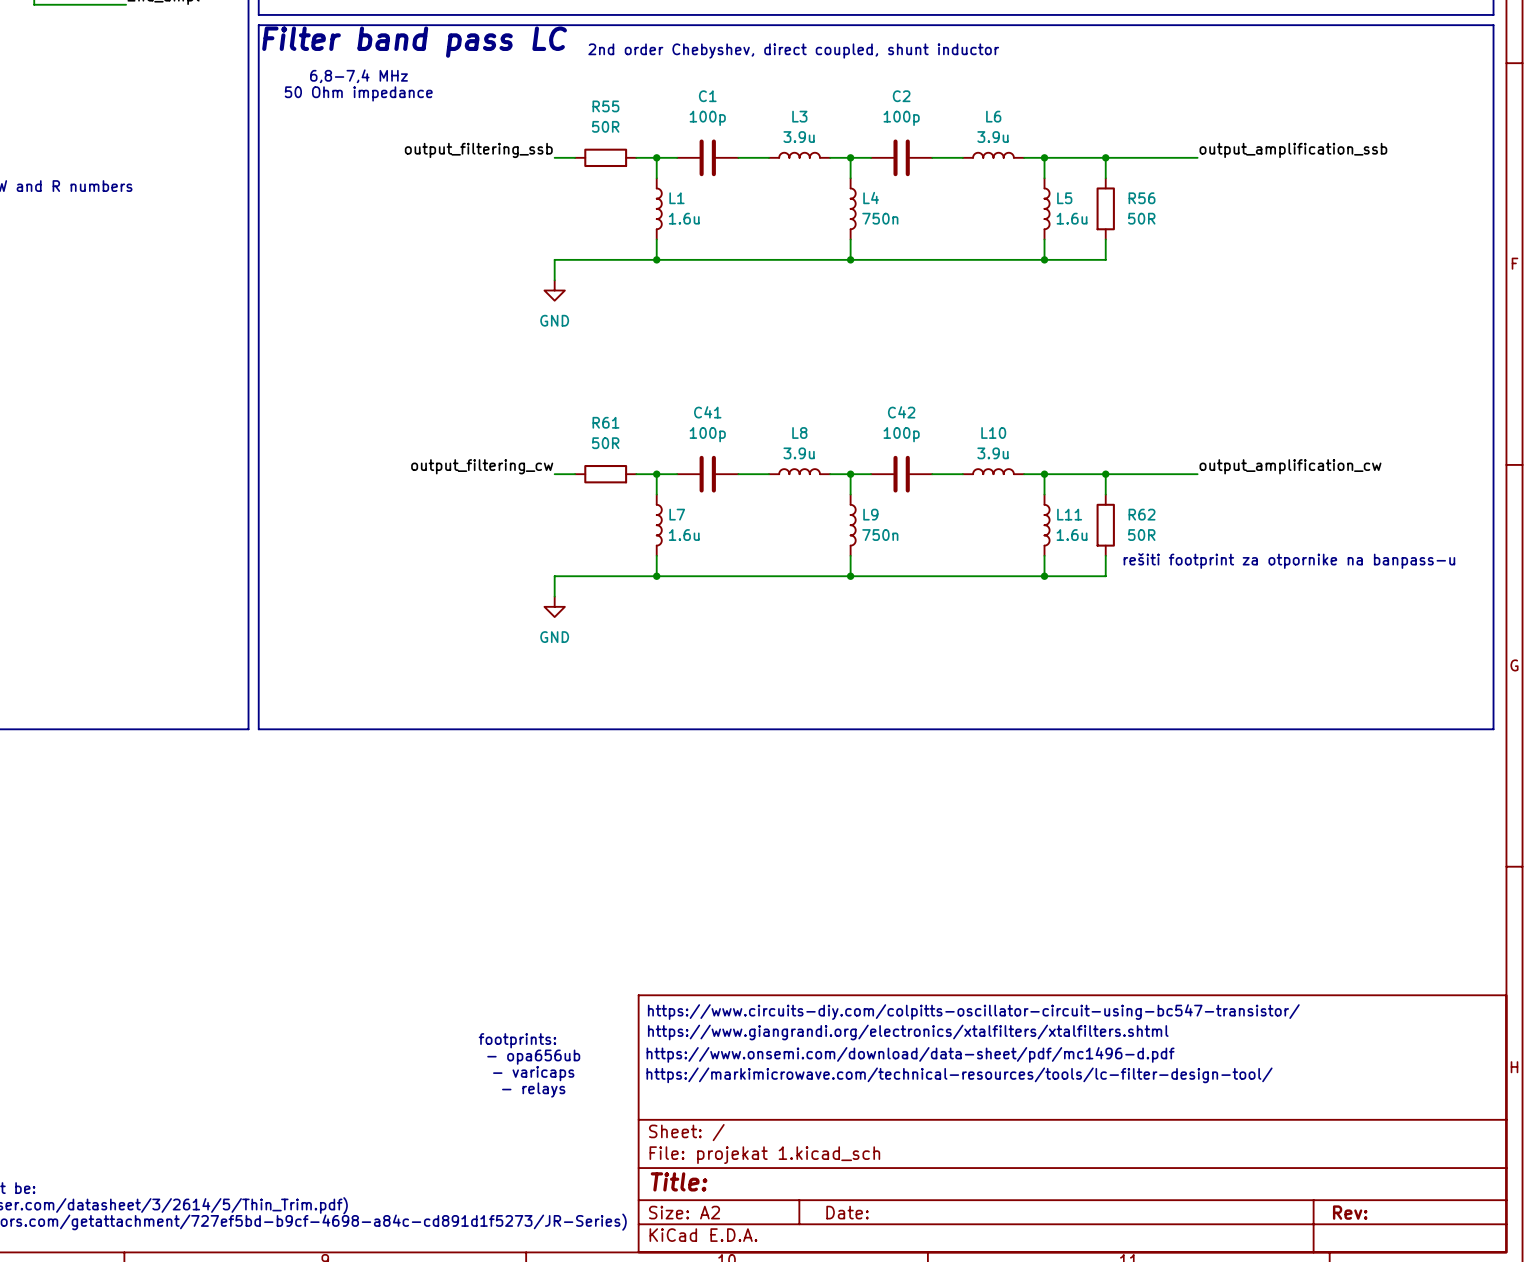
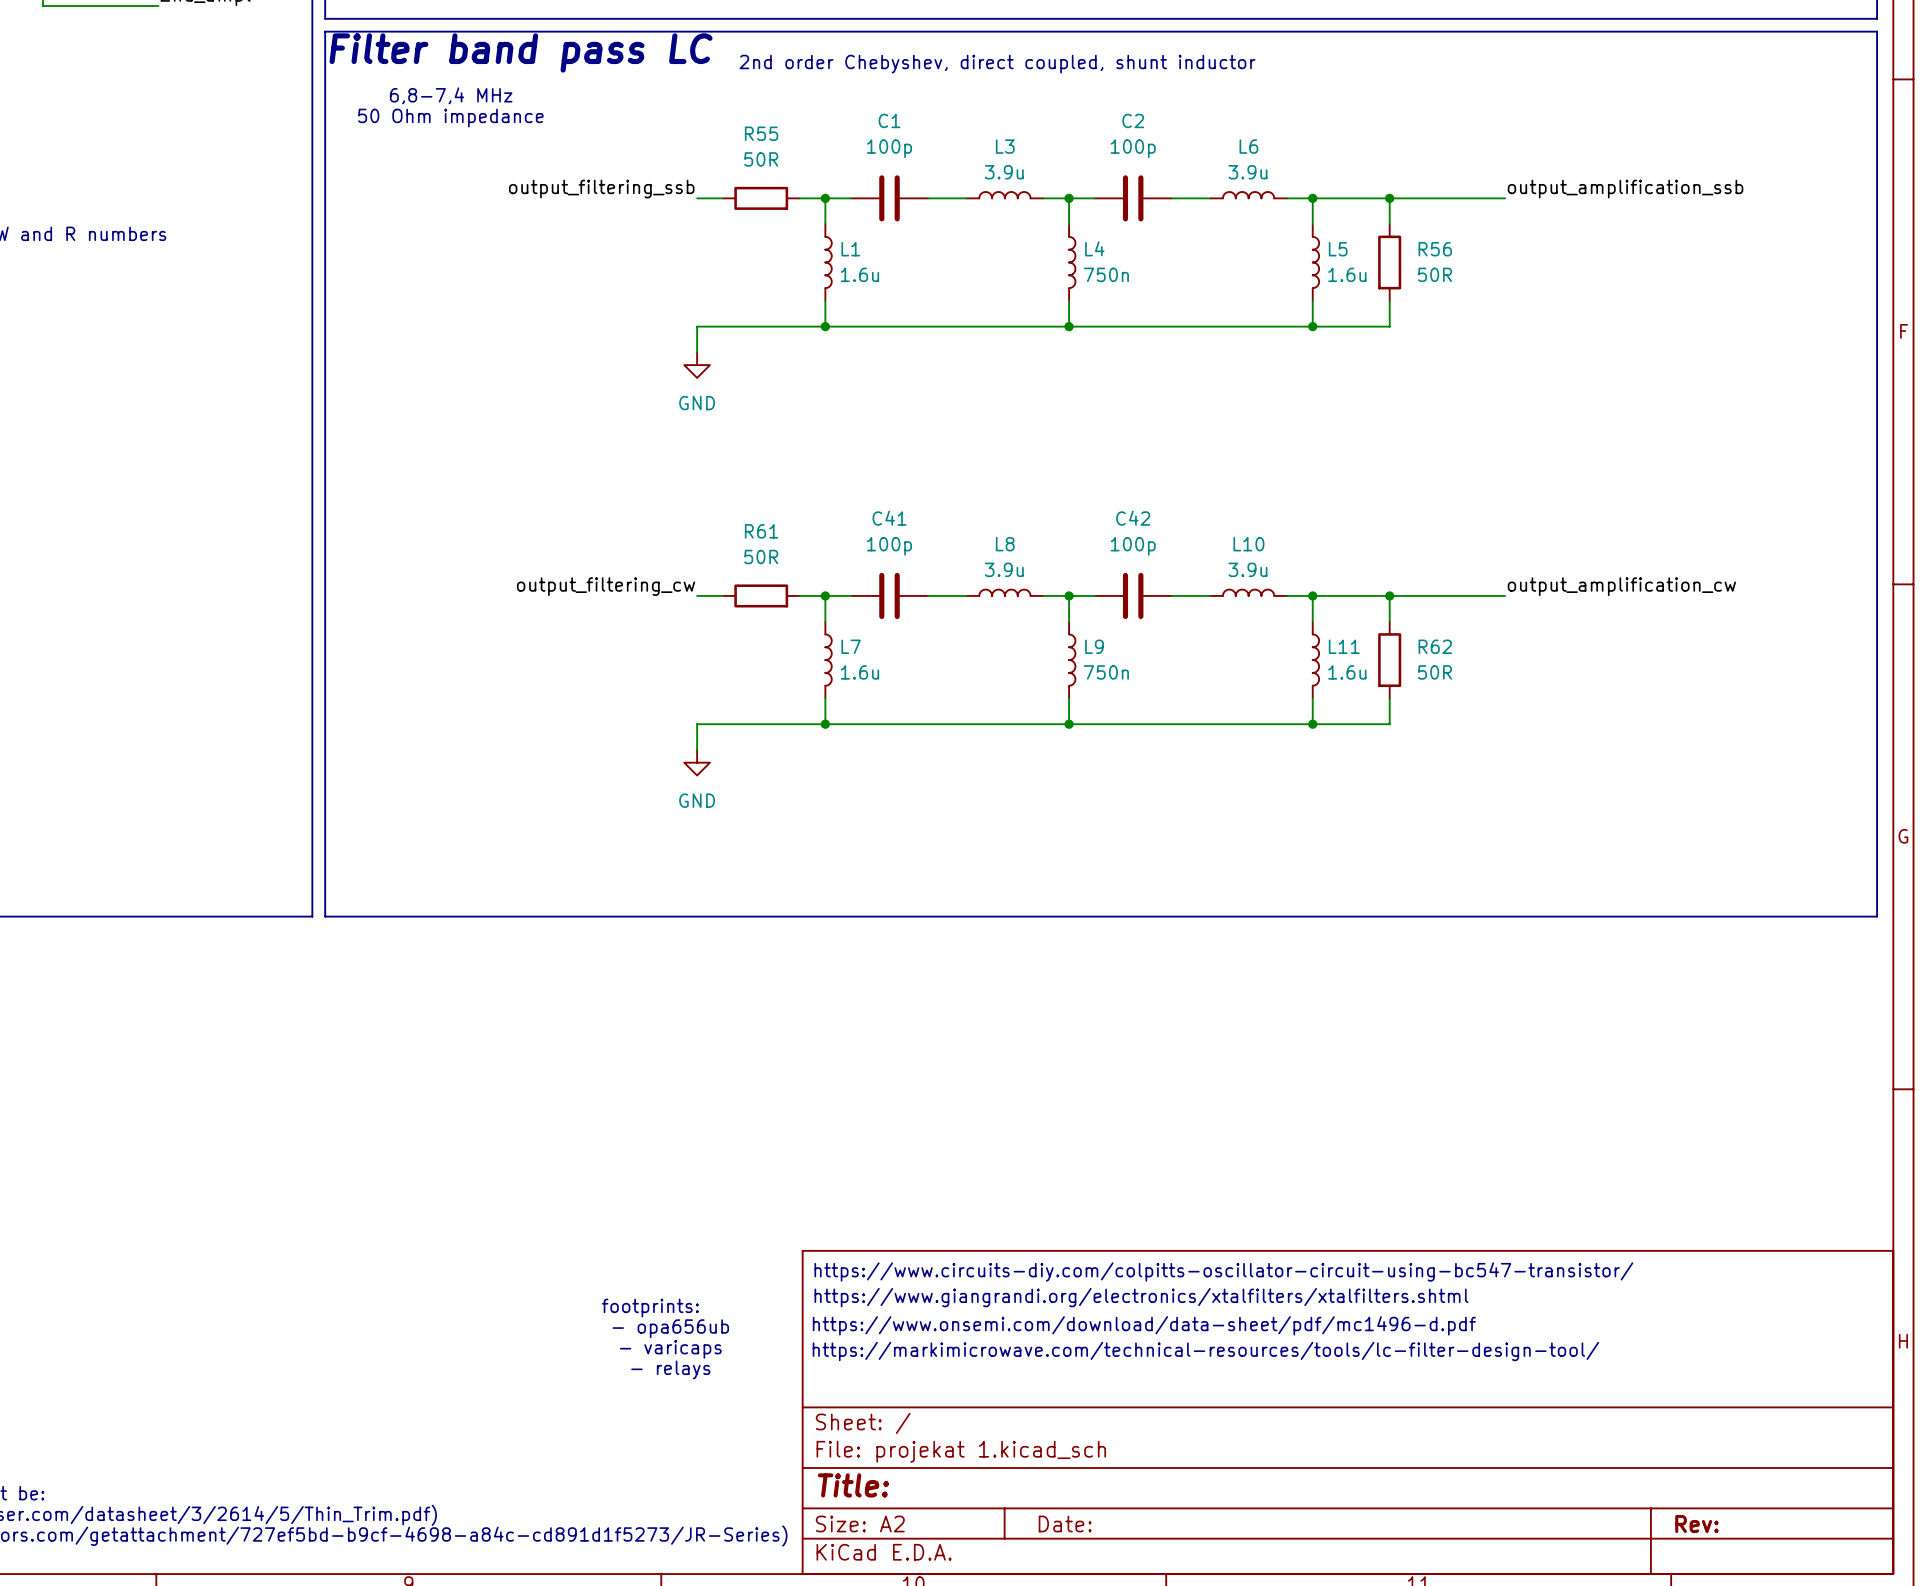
text: rešiti footprint za otpornike na banpass-u (1289, 561) -> none

